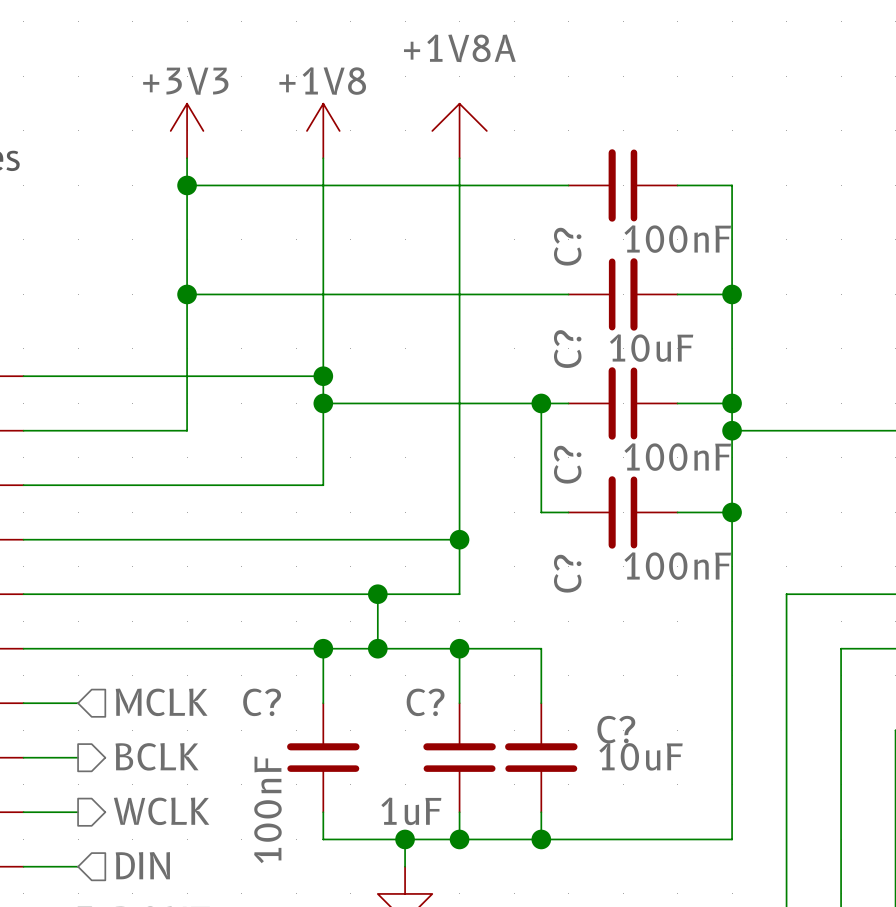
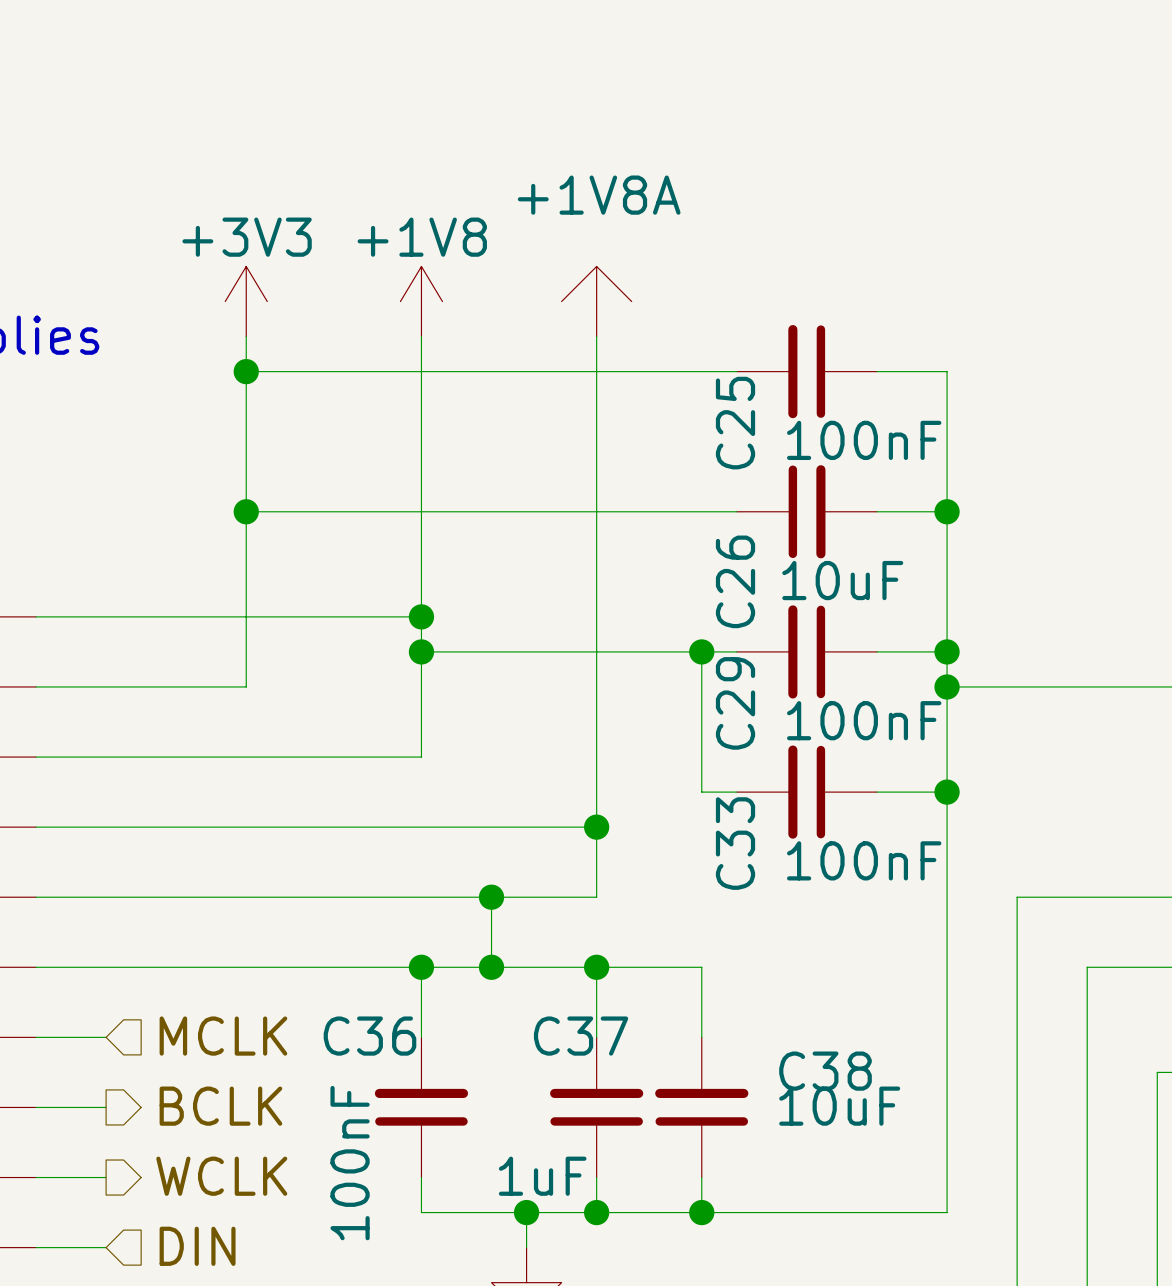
C? name: C? (567, 246) -> C25 (735, 423)
C? name: C? (567, 349) -> C26 (735, 581)
C? name: C? (567, 464) -> C29 (735, 703)
C? name: C? (567, 573) -> C33 (735, 843)
C? name: C? (262, 702) -> C36 (369, 1036)
C? name: C? (425, 702) -> C37 (581, 1036)
C? name: C? (616, 729) -> C38 (825, 1071)

